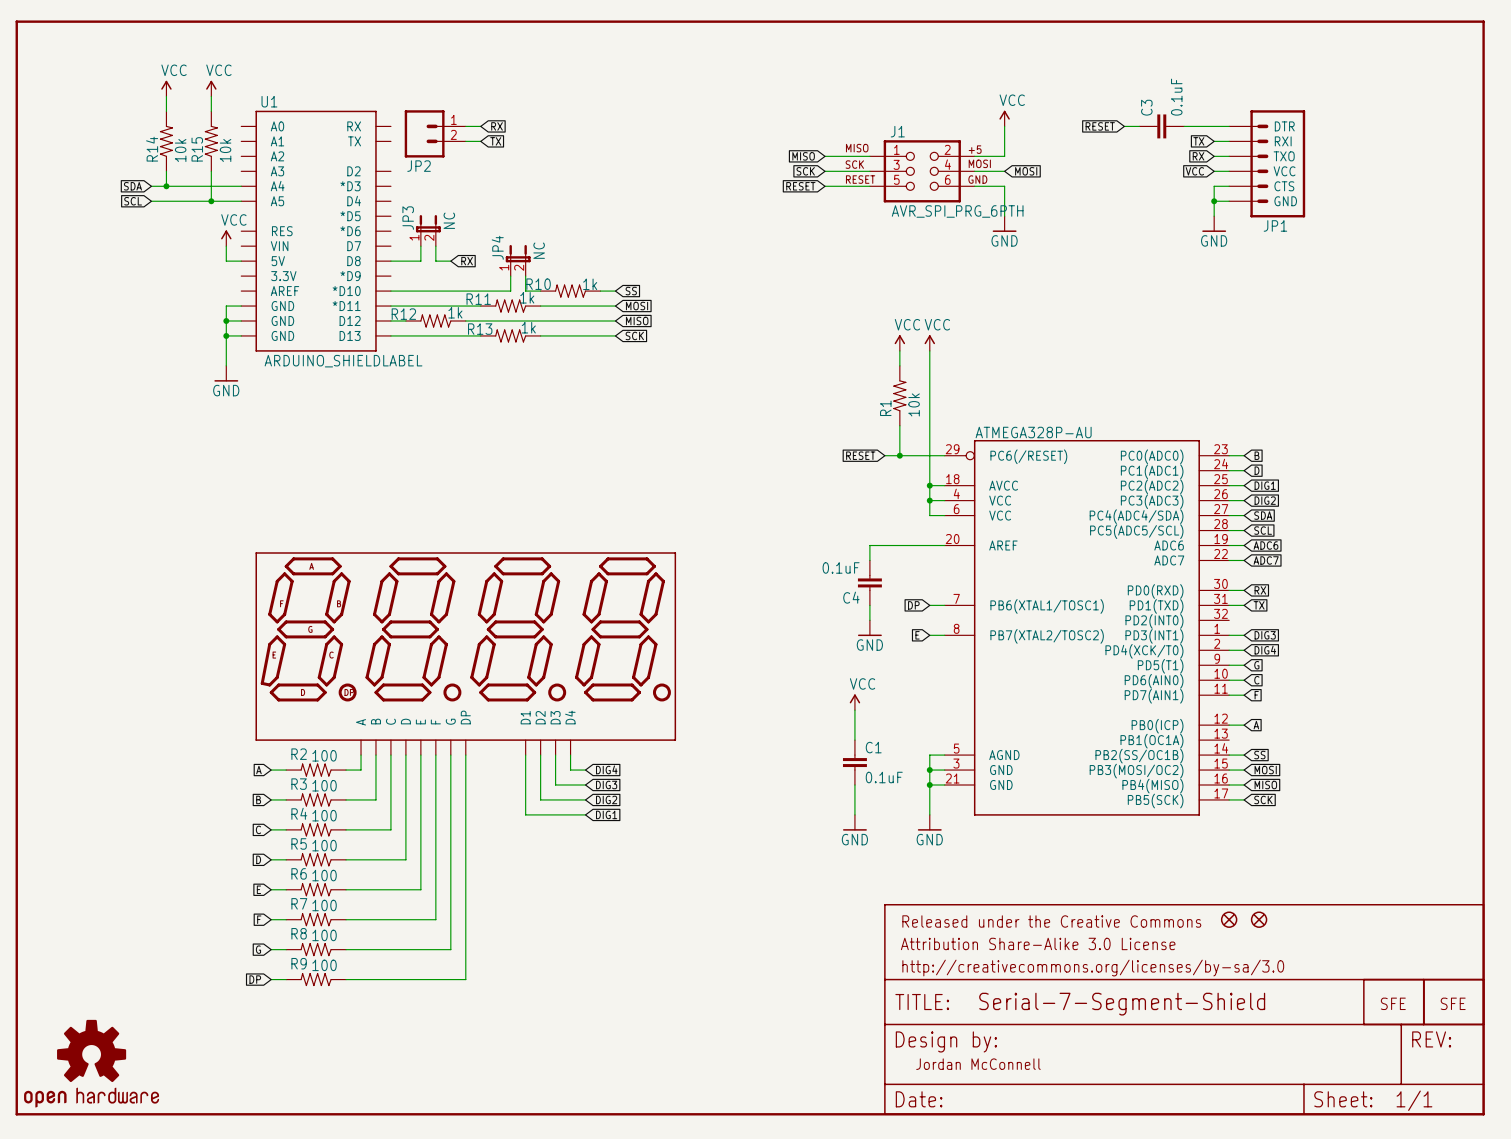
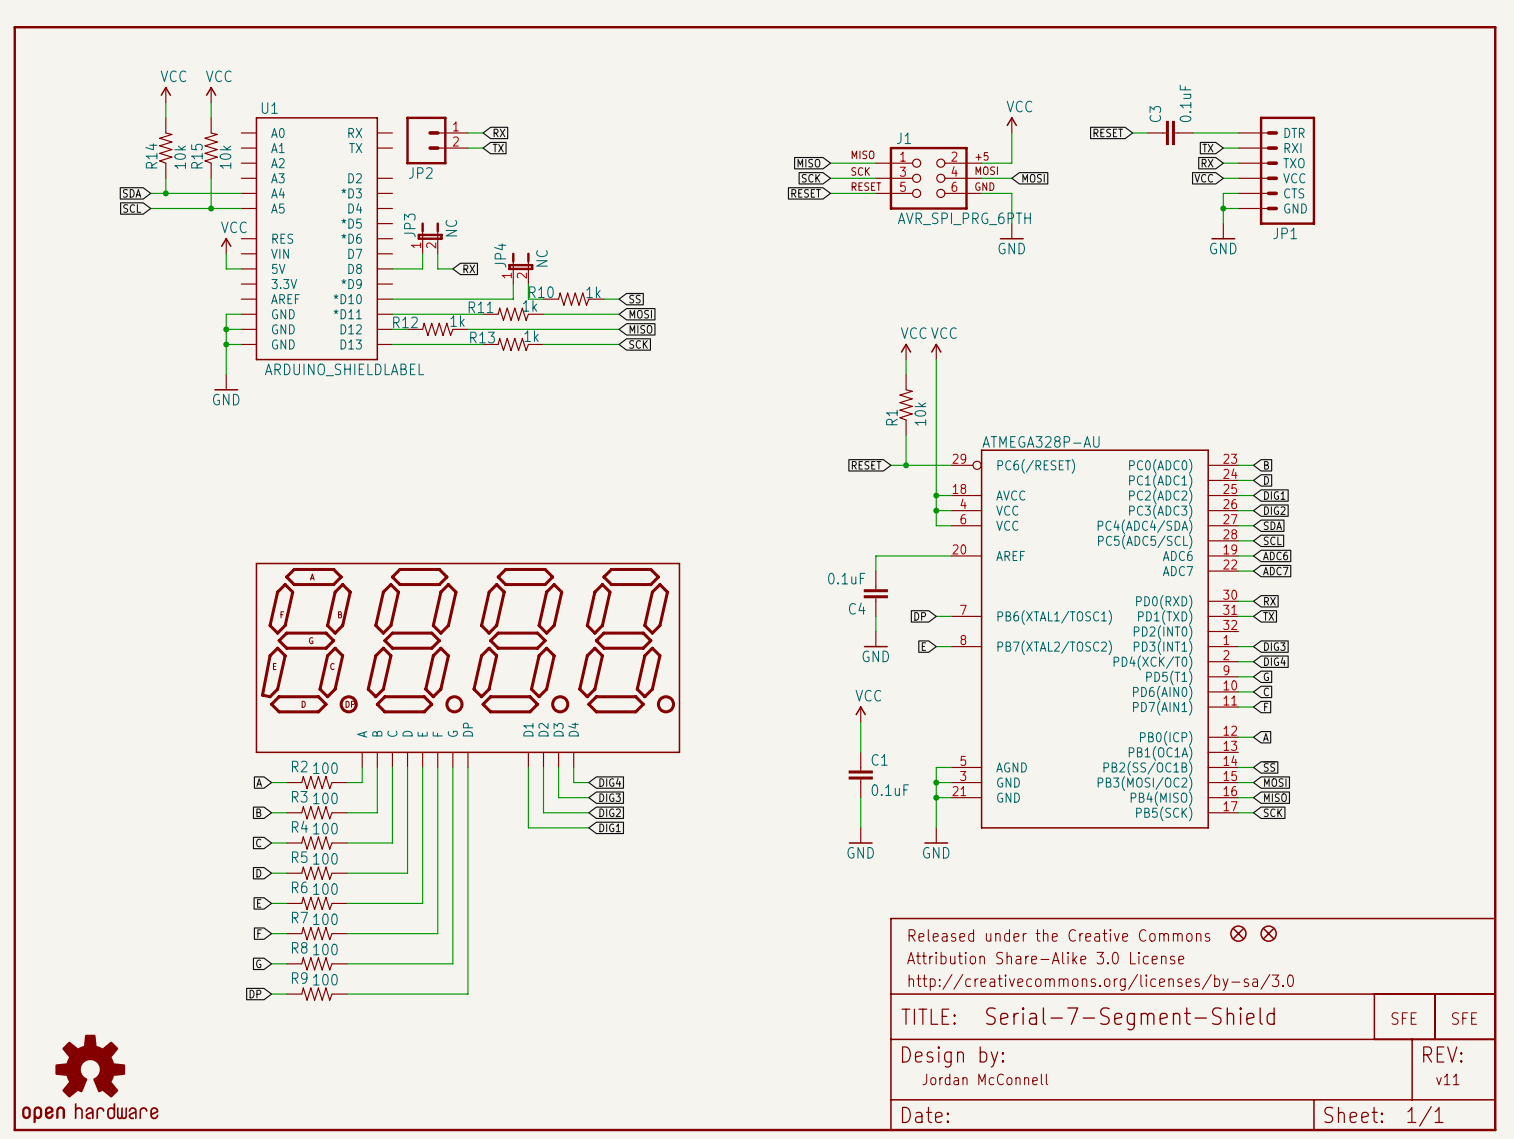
text: none -> v11 (1447, 1079)

